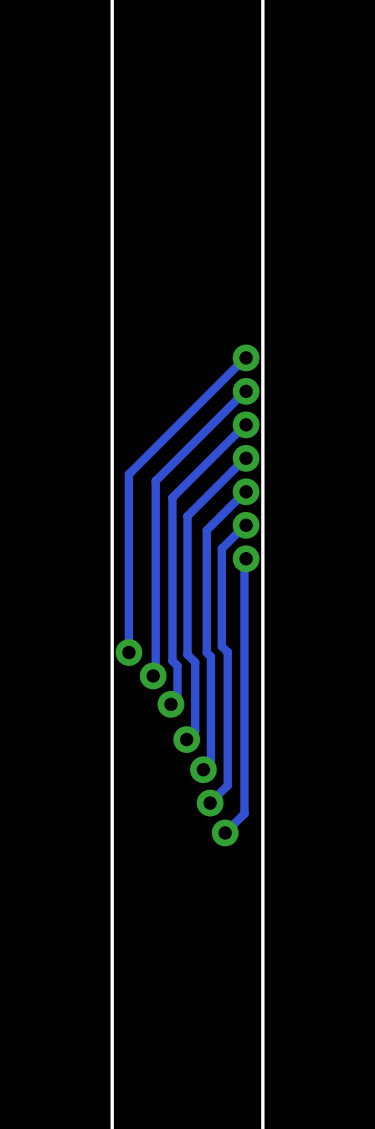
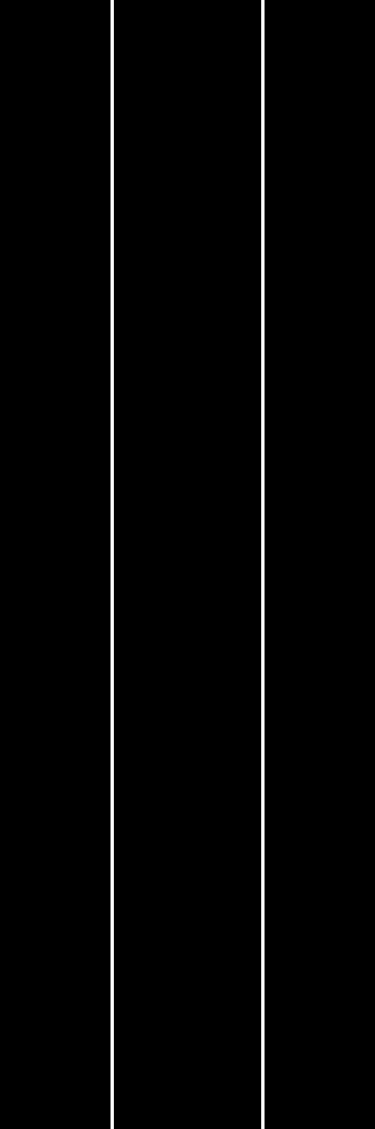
track: (246, 357) (128, 474) (128, 652) -> none
via: (246, 357) -> none
track: (246, 391) (155, 480) (155, 673) (153, 675) -> none
via: (246, 391) -> none
track: (246, 424) (172, 497) (172, 660) (177, 665) (177, 697) (170, 704) -> none
via: (246, 424) -> none
track: (246, 458) (187, 516) (187, 654) (195, 662) (195, 731) (186, 739) -> none
via: (246, 458) -> none
track: (246, 491) (206, 530) (206, 652) (210, 656) (210, 762) (203, 769) -> none
via: (246, 491) -> none
track: (246, 525) (221, 548) (221, 646) (227, 652) (227, 785) (210, 803) -> none
via: (246, 525) -> none
track: (246, 558) (244, 560) (244, 813) (225, 832) -> none
via: (246, 558) -> none
via: (128, 652) -> none
via: (153, 675) -> none
via: (170, 704) -> none
via: (186, 739) -> none
via: (203, 769) -> none
via: (210, 803) -> none
via: (225, 832) -> none

